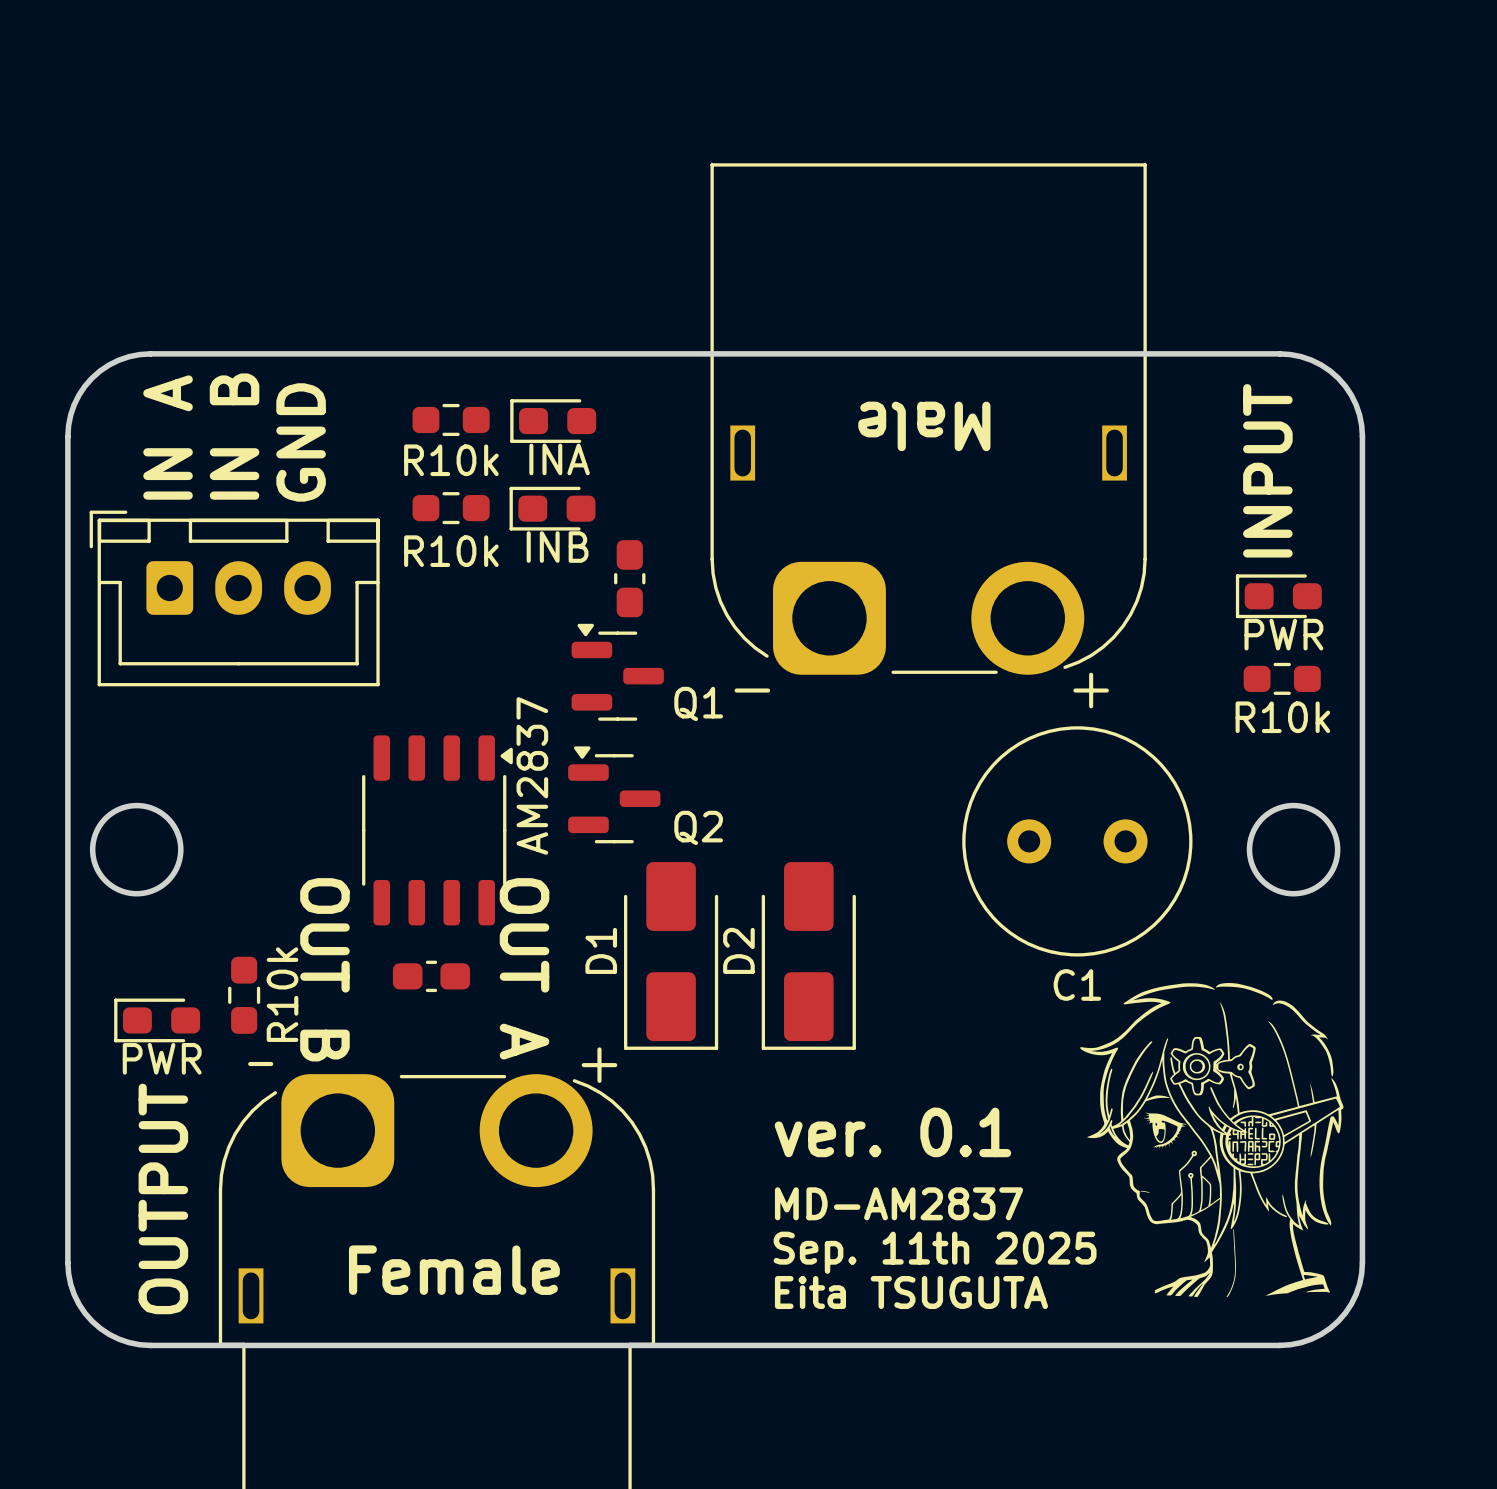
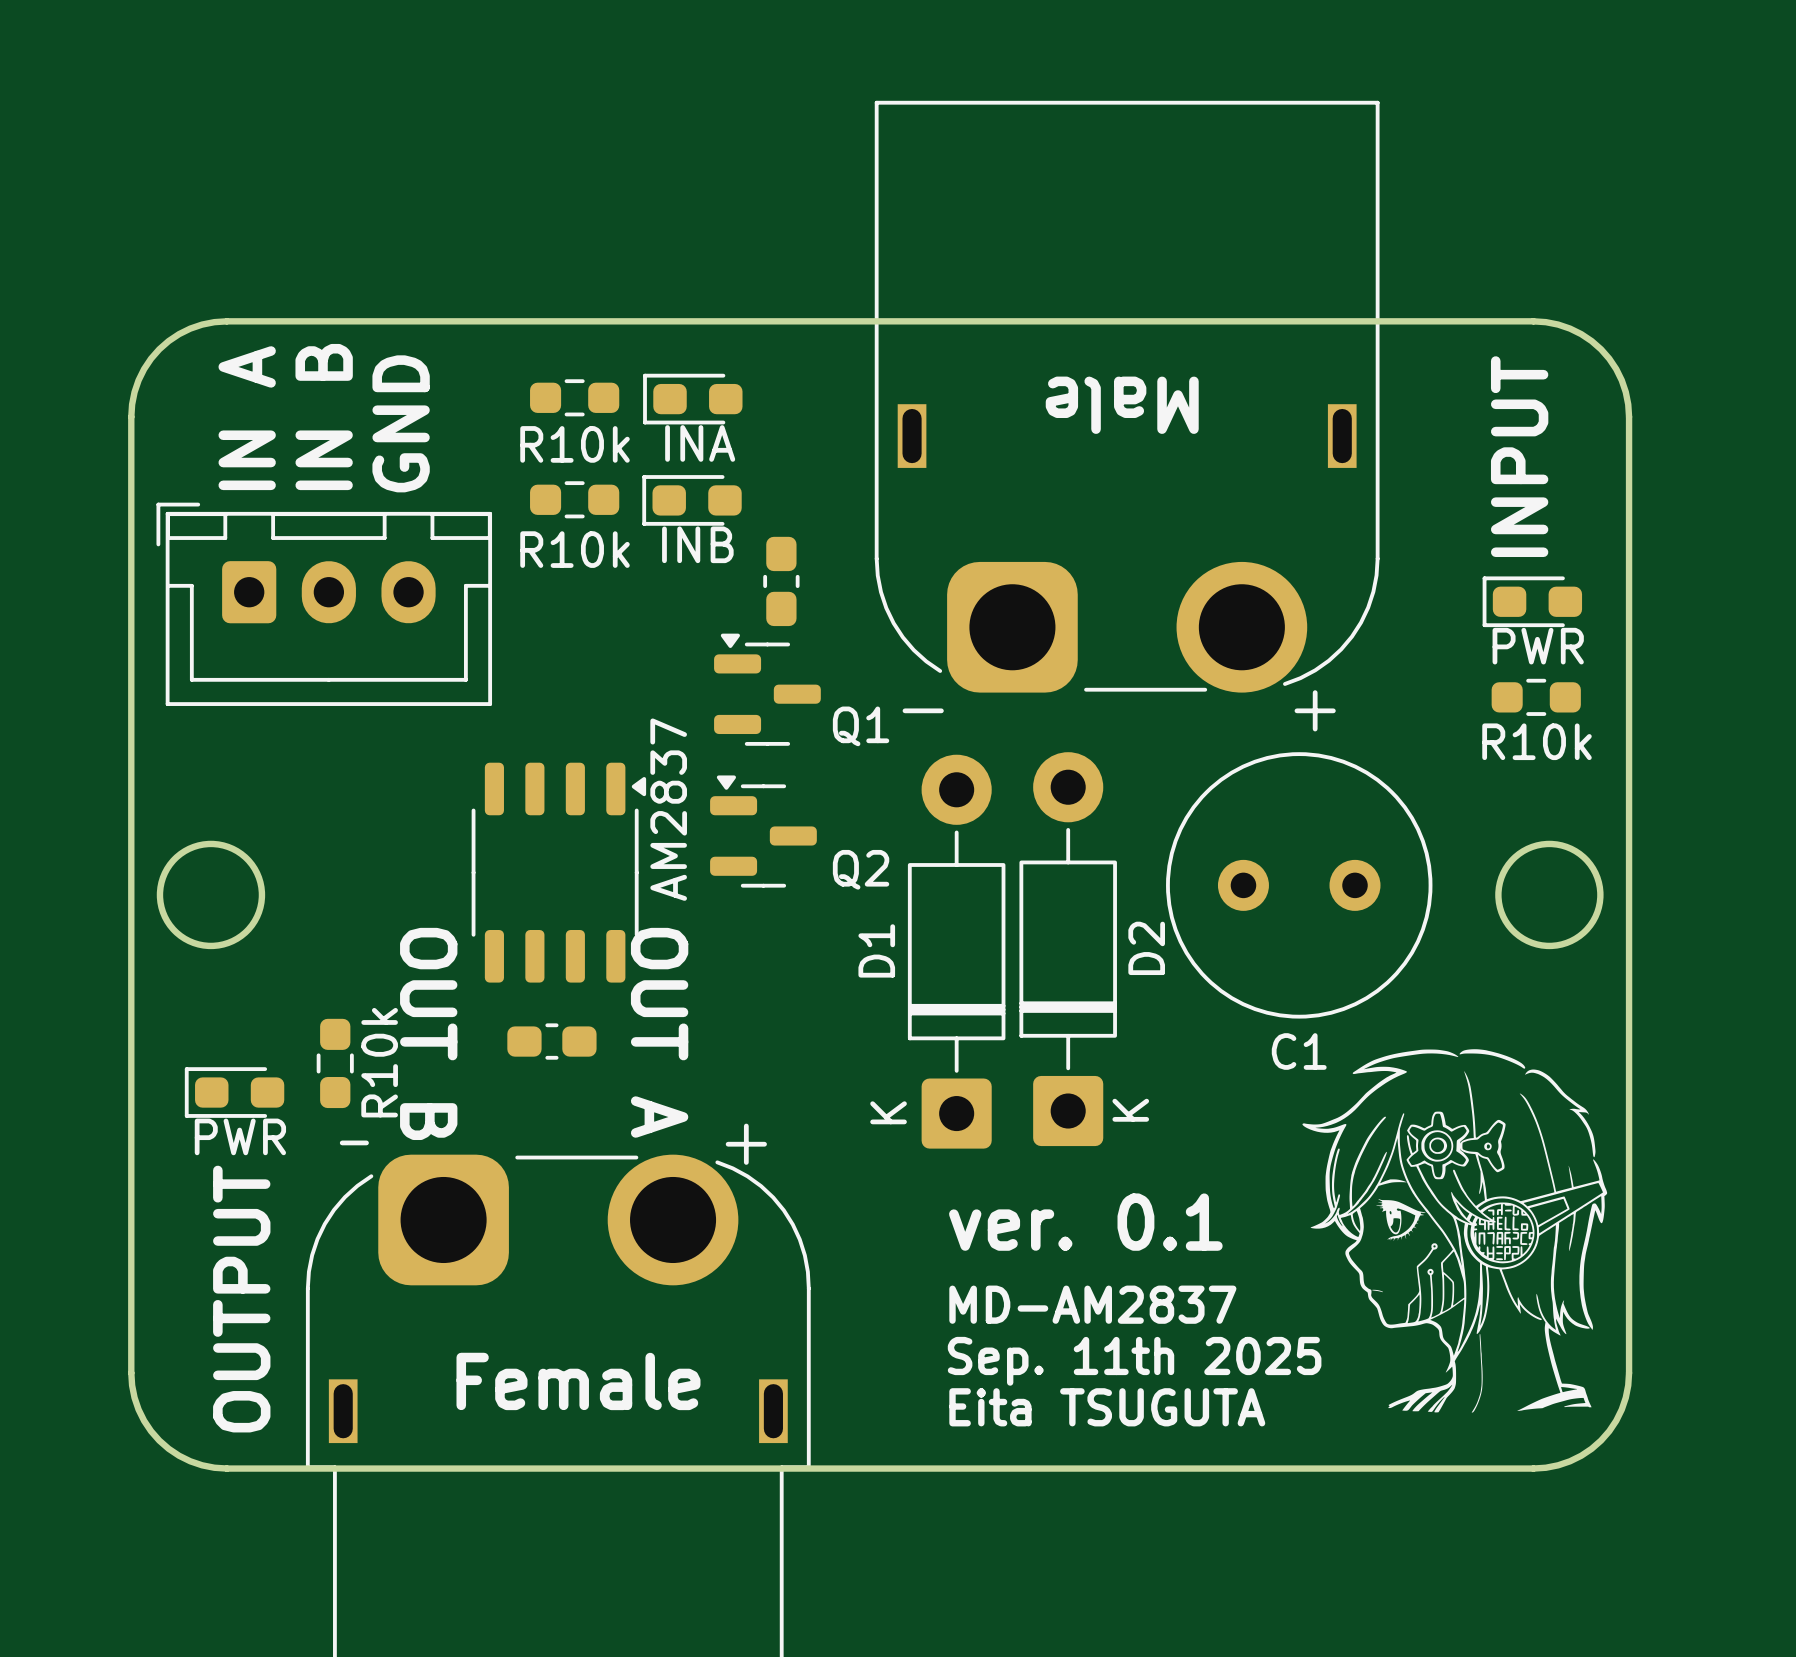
D1 footprint: [623, 862, 719, 1050] -> [907, 754, 1006, 1149]
D2 footprint: [761, 862, 856, 1050] -> [1019, 752, 1117, 1147]
D2 name position: D2 (738, 950) -> D2 (1146, 948)

